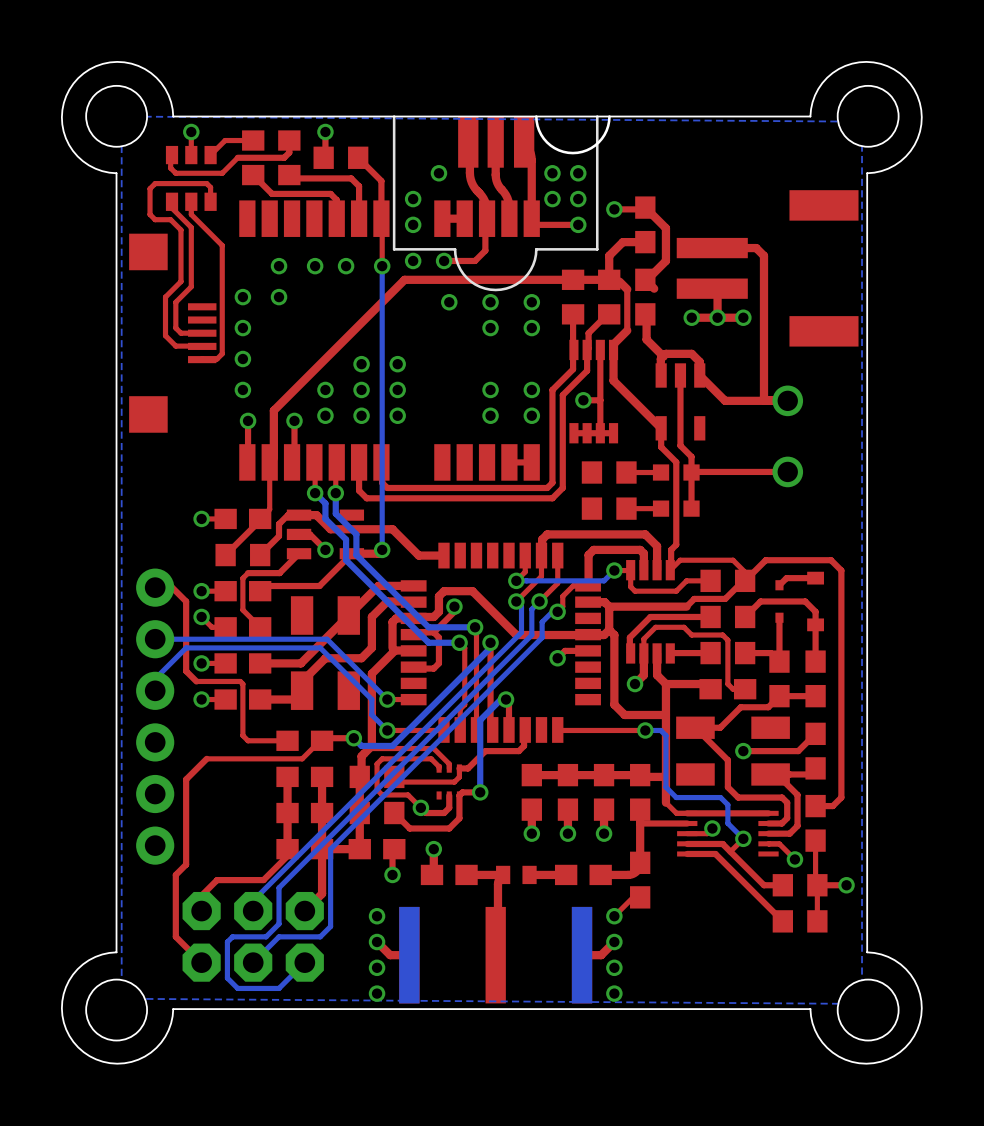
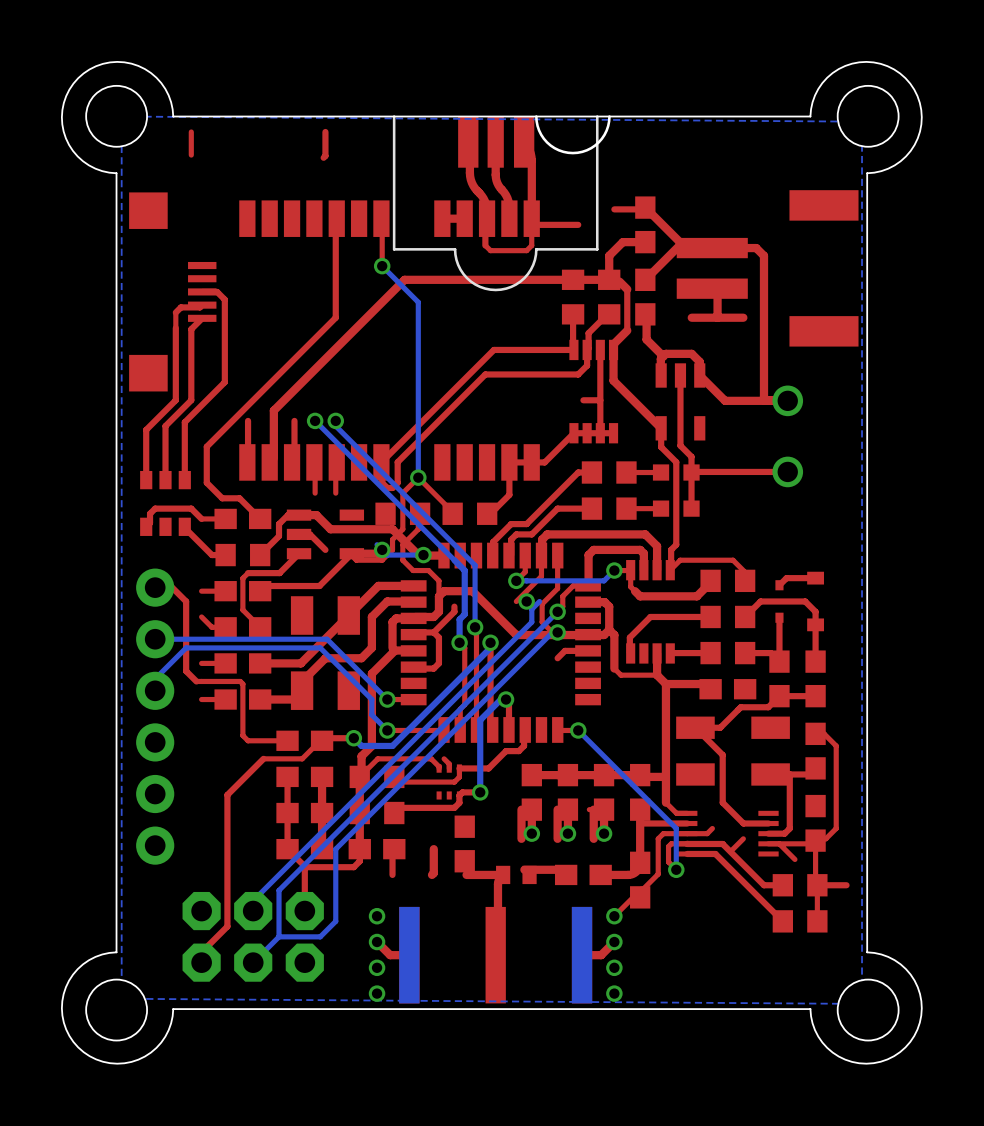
via: (191, 131) -> none
via: (325, 131) -> none
top track: (253, 140) (225, 140) (210, 155) -> none
top track: (289, 140) (289, 152) (284, 157) (237, 157) (222, 173) (175, 173) (170, 168) (172, 155) -> none
part: (253, 157) -> none
part: (289, 157) -> none
part: (340, 157) -> none
top track: (358, 157) (381, 181) (381, 218) -> none
via: (438, 173) -> none
via: (552, 173) -> none
via: (578, 173) -> none
top track: (253, 175) (272, 193) (330, 193) (336, 200) (336, 218) -> (260, 515) (260, 518) (239, 498) (222, 498) (206, 482) (206, 446) (335, 317) (336, 218)
top track: (289, 175) (292, 178) (351, 178) (359, 186) (359, 218) -> none
part position: (191, 178) -> (165, 503)
via: (413, 199) -> none
via: (552, 199) -> none
via: (578, 199) -> none
top track: (172, 201) (172, 208) (191, 227) (191, 286) (175, 302) (175, 312) -> (202, 305) (199, 307) (180, 307) (175, 312)
top track: (191, 201) (191, 214) (222, 245) (222, 353) (217, 359) (202, 359) -> none
top track: (210, 201) (210, 187) (206, 183) (155, 183) (150, 188) (150, 214) (155, 219) (170, 219) (180, 230) (180, 281) (165, 297) (165, 335) (175, 346) (202, 346) -> none
via: (614, 209) -> none
via: (413, 224) -> none
via: (578, 224) -> none
top track: (665, 228) (665, 260) (645, 279) (654, 288) -> (665, 228) (680, 244) (645, 279)
top track: (485, 245) (485, 250) (475, 260) (444, 260) -> (485, 245) (490, 250) (526, 250) (531, 245) (531, 219)
via: (413, 260) -> none
via: (444, 260) -> none
via: (279, 266) -> none
via: (315, 266) -> none
via: (346, 266) -> none
bottom track: (382, 266) (382, 549) -> (382, 266) (418, 302) (418, 477)
top track: none -> (202, 291) (217, 291) (224, 299) (224, 382) (184, 422) (184, 480)
via: (242, 297) -> none
via: (279, 297) -> none
via: (449, 302) -> none
via: (490, 302) -> none
via: (531, 302) -> none
via: (691, 317) -> none
via: (717, 317) -> none
via: (743, 317) -> none
top track: none -> (202, 318) (191, 329) (191, 400) (165, 426) (165, 480)
top track: (175, 328) (180, 333) (202, 333) -> (175, 328) (175, 400) (146, 429) (146, 480)
via: (242, 328) -> none
via: (490, 328) -> none
via: (531, 328) -> none
part position: (172, 333) -> (172, 291)
top track: (573, 349) (573, 369) (552, 389) (552, 482) (547, 487) (392, 487) -> (587, 365) (578, 374) (485, 374) (397, 462) (397, 482) (392, 487)
top track: none -> (573, 349) (493, 349) (381, 462)
via: (242, 359) -> none
via: (361, 364) -> none
via: (397, 364) -> none
top track: (587, 365) (587, 370) (562, 395) (562, 487) -> (591, 472) (578, 472) (562, 487)
via: (242, 389) -> none
via: (325, 389) -> none
via: (361, 389) -> none
via: (397, 389) -> none
via: (490, 389) -> none
via: (531, 389) -> none
via: (583, 400) -> none
via: (325, 415) -> none
via: (361, 415) -> none
via: (397, 415) -> none
via: (490, 415) -> none
via: (531, 415) -> none
via: (248, 420) -> none
via: (294, 420) -> none
via: none -> (315, 420)
via: none -> (335, 420)
top track: none -> (573, 433) (544, 462) (531, 462)
top track: (269, 462) (269, 509) (225, 555) -> (186, 529) (211, 555) (225, 555)
top track: (359, 462) (359, 490) (366, 498) (552, 498) -> (490, 555) (493, 552) (493, 542) (511, 524) (526, 524) (552, 498)
top track: none -> (509, 462) (509, 494) (495, 508) (492, 508) (487, 513)
via: none -> (418, 477)
bottom track: (315, 493) (325, 503) (325, 518) (346, 539) (346, 560) (428, 642) (459, 642) -> (315, 420) (464, 570) (464, 614) (459, 619) (459, 642)
via: (315, 493) -> none
bottom track: (335, 493) (335, 513) (356, 534) (356, 555) (428, 627) (475, 627) -> (335, 420) (335, 426) (475, 565) (475, 627)
via: (335, 493) -> none
top track: none -> (591, 508) (557, 508) (531, 534) (516, 534) (511, 539) (511, 555)
part: none -> (402, 513)
top track: none -> (420, 513) (418, 513) (418, 529) (402, 544) (402, 560) (413, 570) (428, 570) (438, 580) (438, 596)
top track: none -> (452, 513) (418, 477) (402, 493) (402, 529) (392, 539) (392, 549) (382, 560) (356, 560) (351, 555)
part: none -> (469, 513)
top track: none -> (201, 518) (191, 508) (155, 508) (150, 513) (150, 523) (146, 526)
via: (201, 518) -> none
bottom track: none -> (377, 544) (387, 555) (423, 555)
via: (325, 549) -> none
via: none -> (423, 555)
top track: (557, 555) (557, 583) (539, 601) -> (557, 555) (557, 588) (542, 604) (542, 622) (552, 632) (557, 632)
top track: (712, 580) (686, 580) (676, 591) (635, 591) -> (712, 580) (696, 596) (640, 596) (635, 591)
via: (201, 591) -> none
bottom track: (516, 601) (521, 606) (521, 632) -> (531, 622) (521, 632)
via: (516, 601) -> none
via: none -> (526, 601)
via: (539, 601) -> none
via: (454, 606) -> none
top track: (609, 606) (686, 606) (694, 598) (725, 598) (765, 560) (831, 560) (841, 570) (841, 797) (832, 806) (815, 806) -> none
bottom track: (557, 611) (552, 611) (542, 622) (542, 637) (330, 849) (330, 926) -> (557, 632) (552, 632) (335, 849) (335, 921) (330, 926)
via: (201, 616) -> none
bottom track: (531, 622) (531, 635) (279, 887) (279, 890) -> (557, 611) (279, 890)
via: none -> (557, 632)
via: (557, 658) -> none
via: (201, 663) -> none
top track: (614, 668) (614, 704) (624, 715) (665, 715) -> (614, 668) (620, 675) (657, 675)
top track: (635, 684) (643, 675) (643, 639) (655, 627) (684, 627) (691, 635) (722, 635) (727, 640) (727, 684) (733, 689) (745, 689) -> none
via: (635, 684) -> none
via: (201, 699) -> none
bottom track: none -> (578, 730) (676, 828) (676, 869)
via: none -> (578, 730)
top track: (645, 730) (578, 730) -> none
bottom track: (645, 730) (660, 730) (665, 735) (665, 787) (676, 797) (720, 797) (727, 804) (727, 823) (743, 838) -> none
via: (645, 730) -> none
top track: (815, 733) (798, 751) (743, 751) -> (815, 733) (824, 733) (836, 745) (836, 828) (825, 838) (815, 840)
top track: (369, 748) (433, 748) (444, 758) -> none
top track: (506, 751) (485, 751) (468, 768) -> (506, 751) (488, 768) (468, 768)
via: (743, 751) -> none
top track: (722, 755) (727, 760) (727, 787) (738, 797) (782, 797) (787, 802) (787, 818) (781, 823) (768, 823) -> (722, 755) (722, 802) (743, 823) (768, 823)
top track: (263, 758) (206, 758) (186, 779) (186, 864) (175, 874) (175, 936) (201, 962) -> (263, 758) (227, 794) (227, 926) (201, 952) (201, 962)
top track: (382, 758) (377, 764) (377, 789) (382, 794) (408, 794) (426, 813) (444, 813) (449, 807) (449, 795) -> (382, 758) (377, 758) (359, 776)
top track: (777, 774) (797, 794) (797, 825) (789, 833) (784, 833) -> (789, 774) (789, 828) (784, 833)
top track: (287, 776) (287, 856) (263, 880) (217, 880) (201, 895) (201, 911) -> none
top track: (459, 802) (459, 818) (449, 828) (409, 828) (394, 813) -> (459, 802) (454, 807) (399, 807) (394, 813)
via: (420, 807) -> none
top track: none -> (521, 809) (521, 838)
top track: none -> (557, 809) (557, 838)
top track: none -> (589, 809) (593, 809) (593, 838)
top track: (768, 813) (687, 813) -> none
via: (712, 828) -> none
top track: none -> (687, 833) (663, 833) (658, 838) (658, 874) (640, 892) (641, 890)
via: (743, 838) -> none
top track: none -> (687, 843) (671, 843) (668, 846) (668, 862) (676, 869)
top track: (359, 849) (322, 849) (322, 893) (304, 911) -> (304, 866) (304, 911)
top track: none -> (359, 849) (359, 861) (353, 867) (305, 867) (287, 849)
via: (433, 849) -> none
via: (794, 859) -> none
top track: none -> (566, 869) (524, 869)
via: none -> (676, 869)
via: (392, 874) -> none
part rotation: 0° (449, 874) -> 90° clockwise (464, 843)
part position: (449, 874) -> (464, 843)
top track: (566, 874) (529, 874) -> none
via: (846, 885) -> none
bottom track: (279, 923) (266, 936) (232, 936) (227, 942) (227, 978) (237, 988) (279, 988) (304, 962) -> (279, 923) (279, 936)

